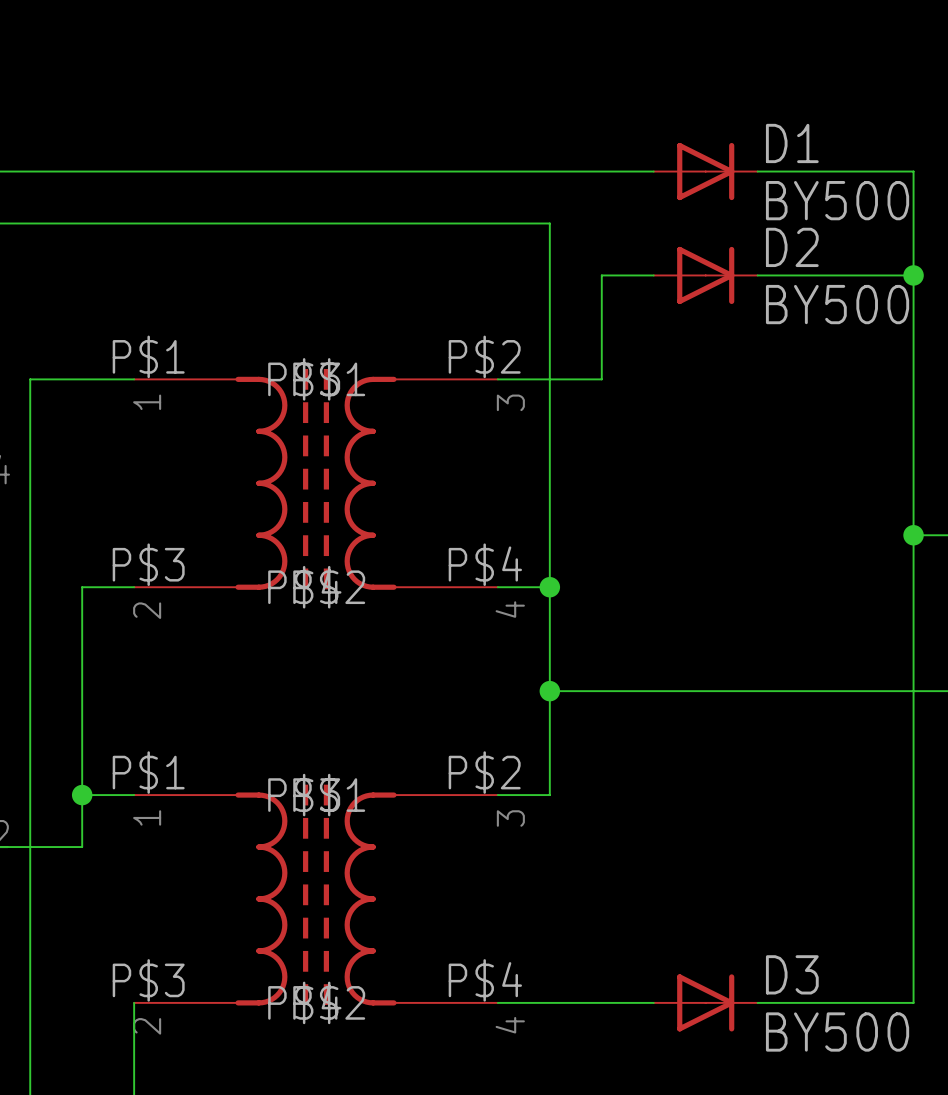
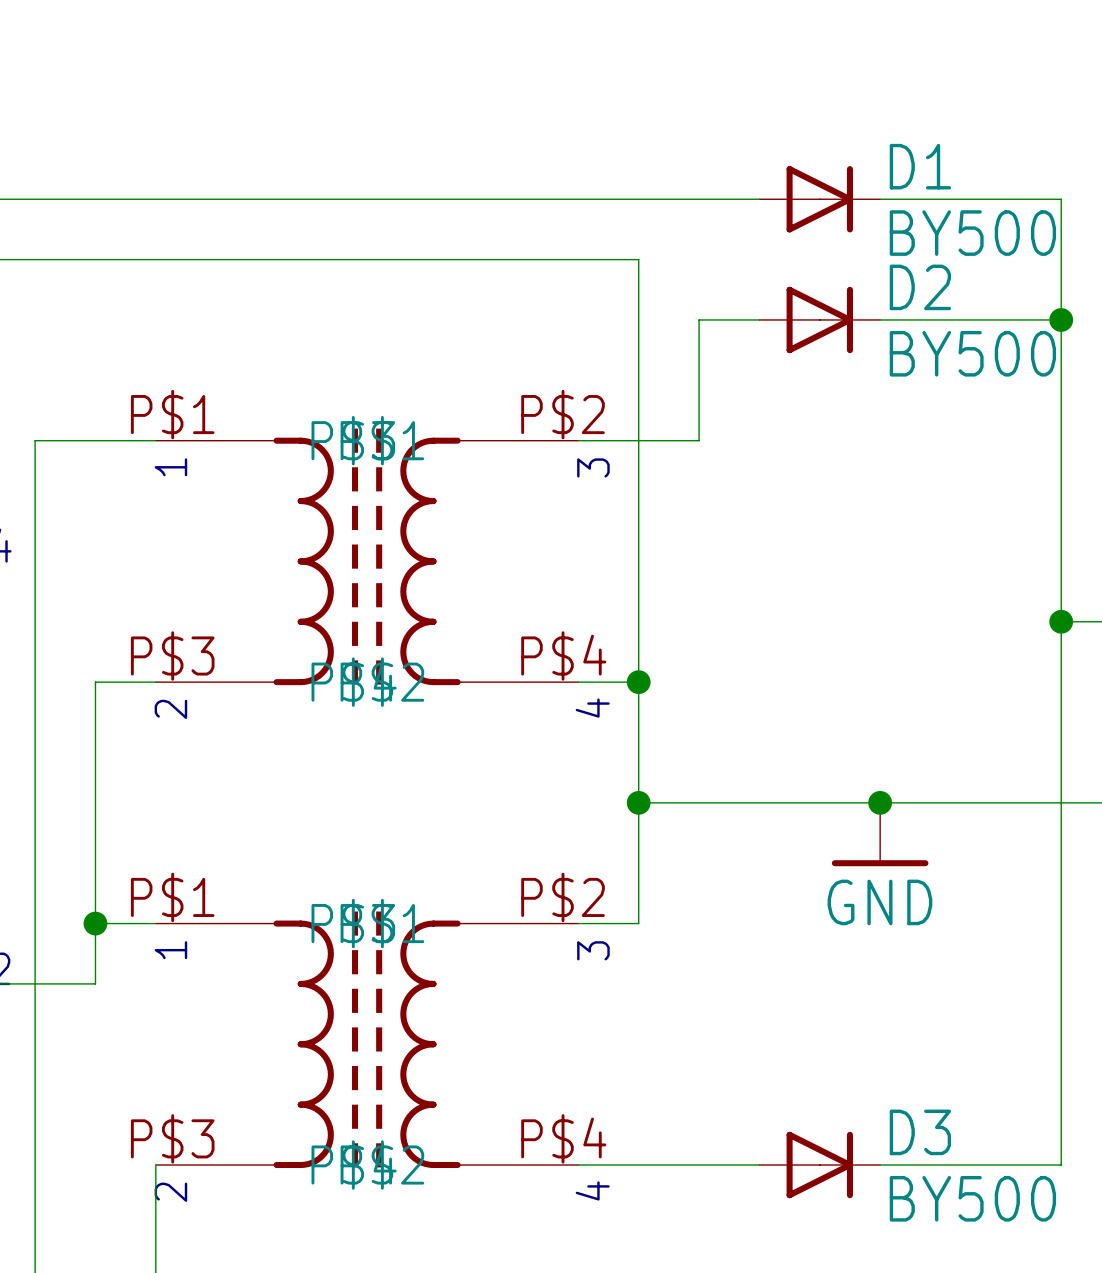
junction: none -> (880, 802)
power symbol: none -> GND (880, 834)

